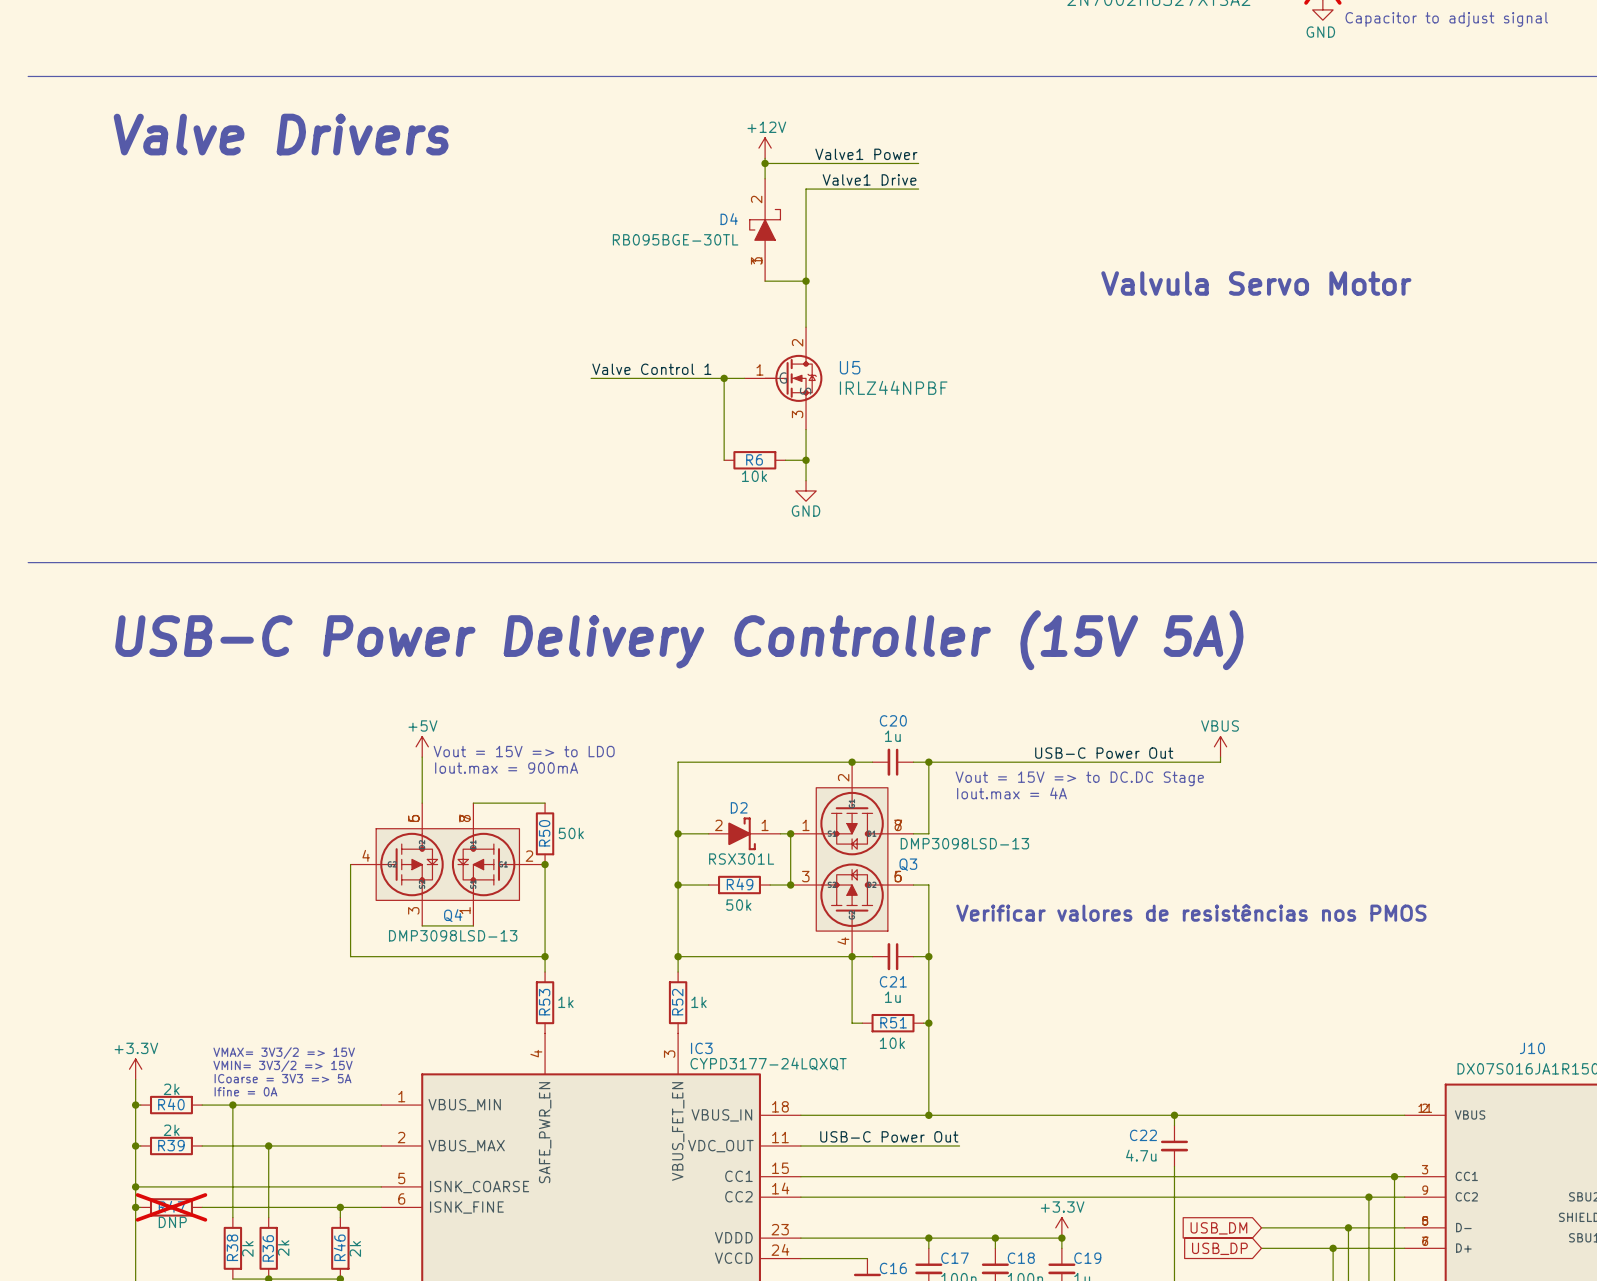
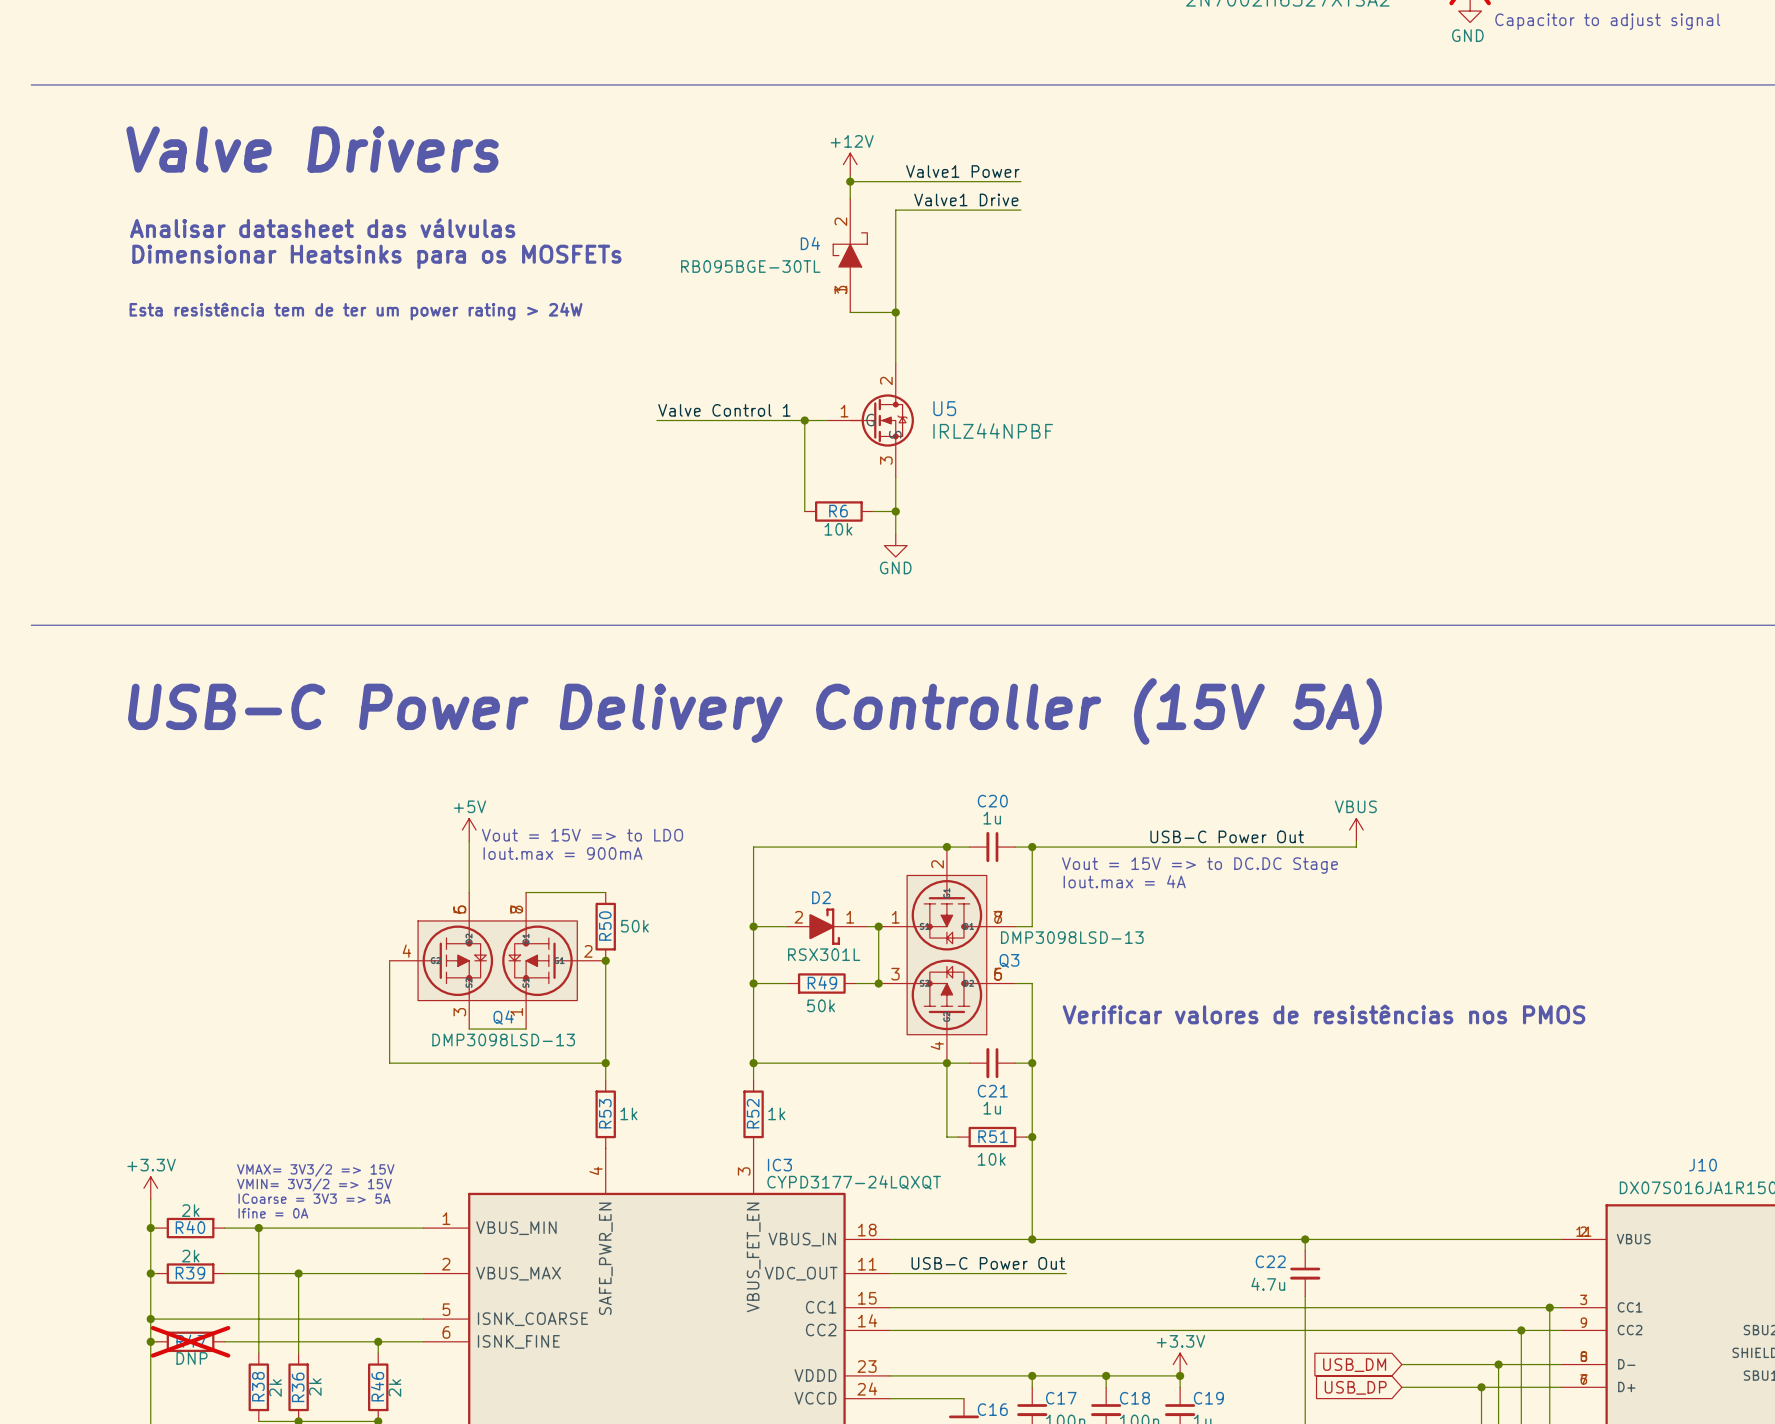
text: none -> Analisar datasheet das válvulas (322, 228)
text: none -> Dimensionar Heatsinks para os MOSFETs (376, 256)
text: none -> Esta resistência tem de ter um power rating > 24W (356, 311)
text: Valvula Servo Motor (1256, 283) -> none

